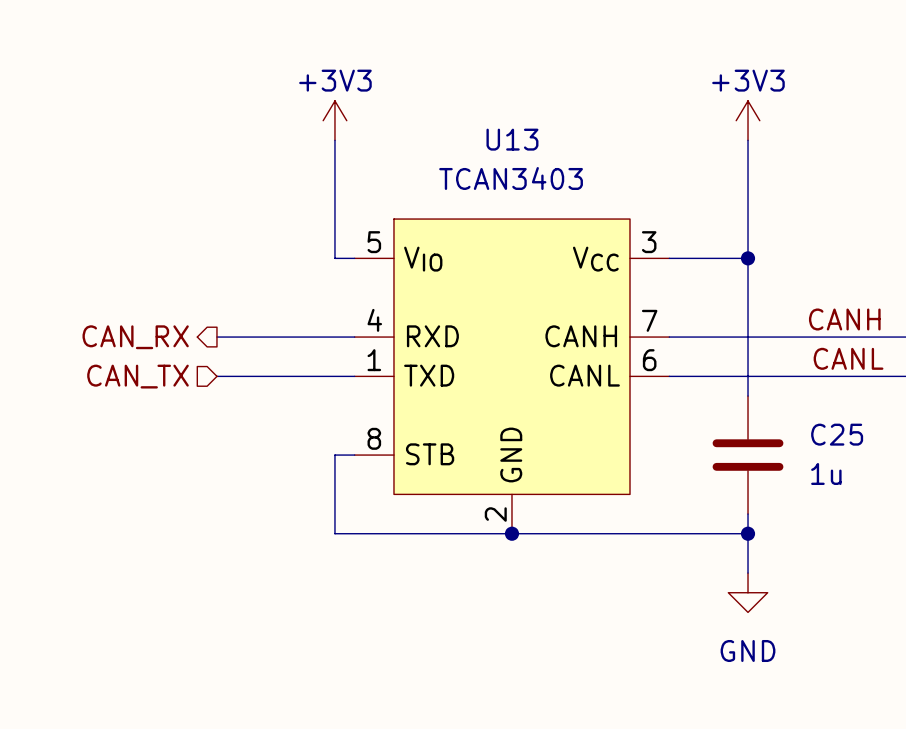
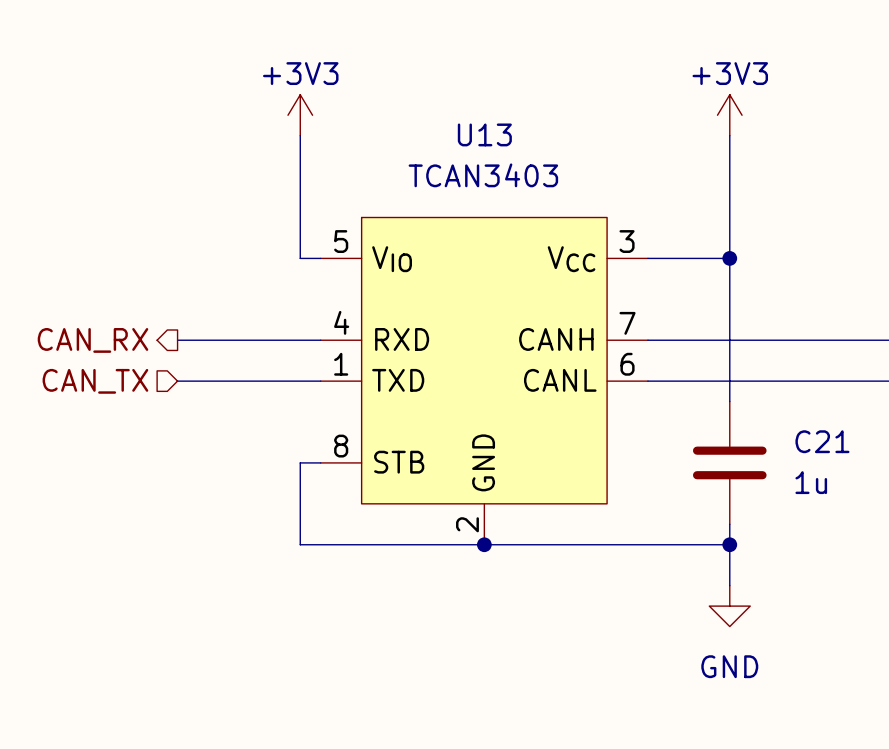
label: CANH (844, 319) -> none
label: CANL (848, 358) -> none
C25 name: C25 (837, 434) -> C21 (822, 441)

